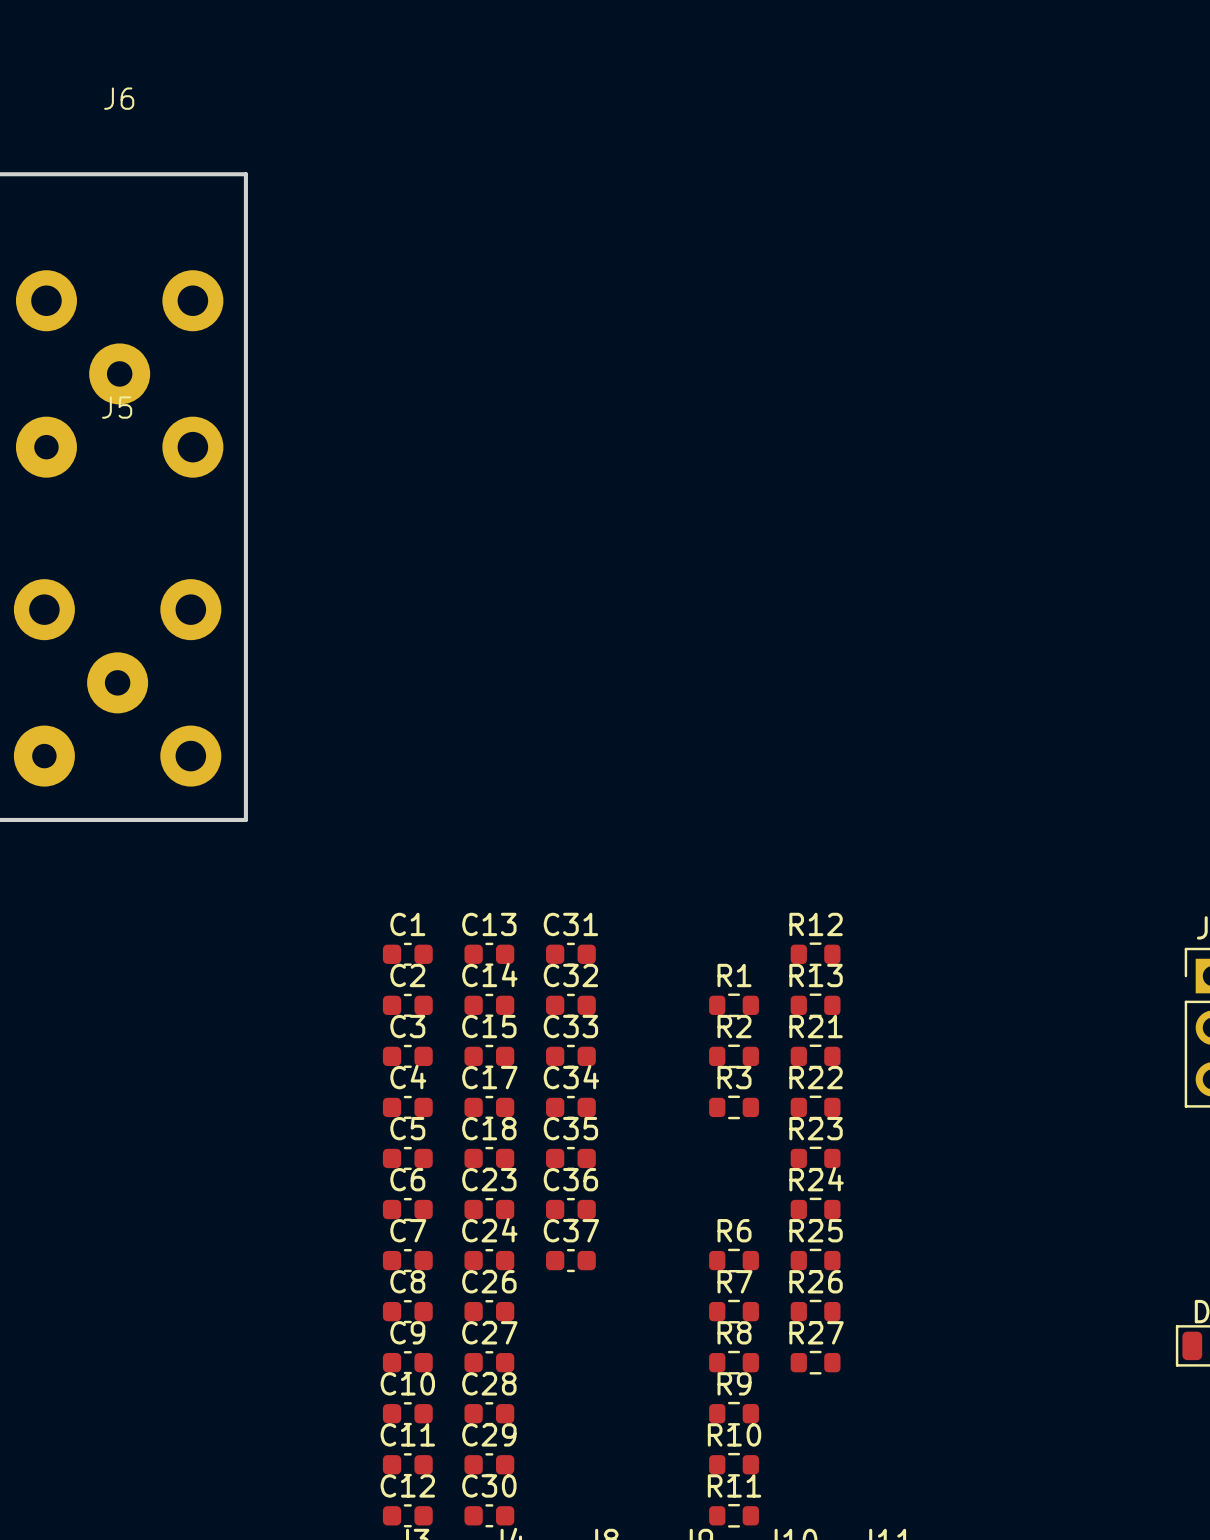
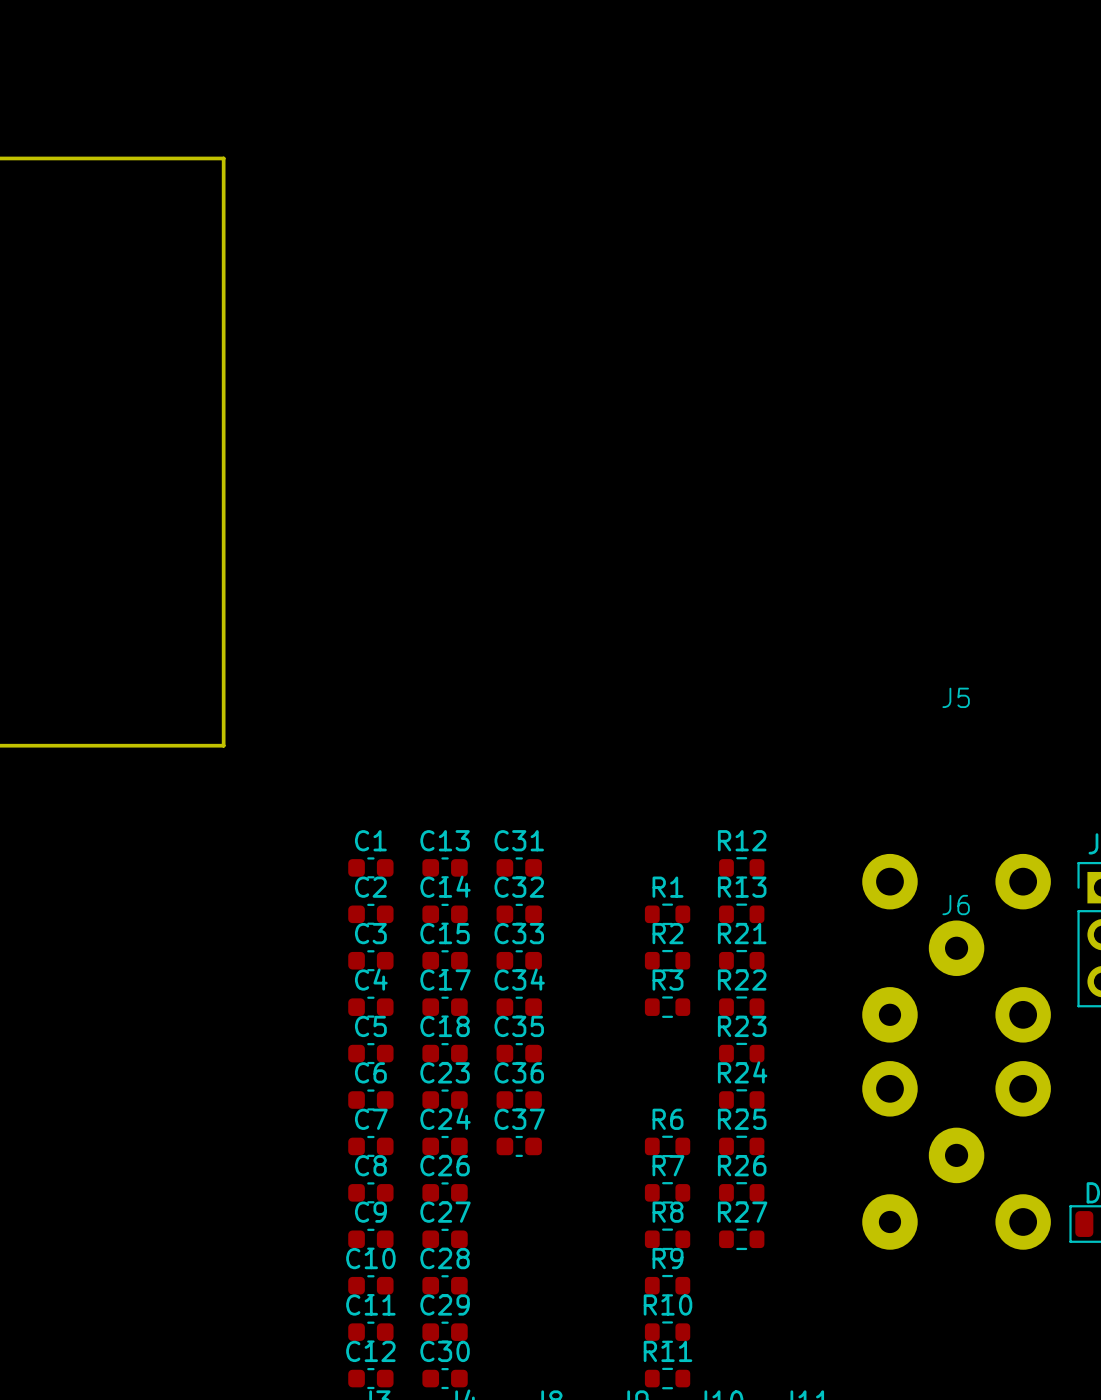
J6 position: (119, 373) -> (956, 1155)
J5 position: (117, 682) -> (956, 948)

